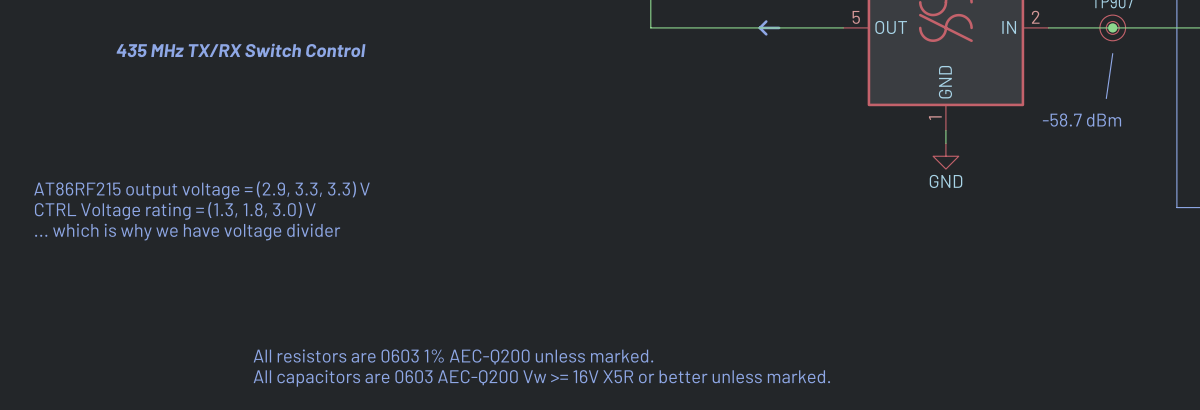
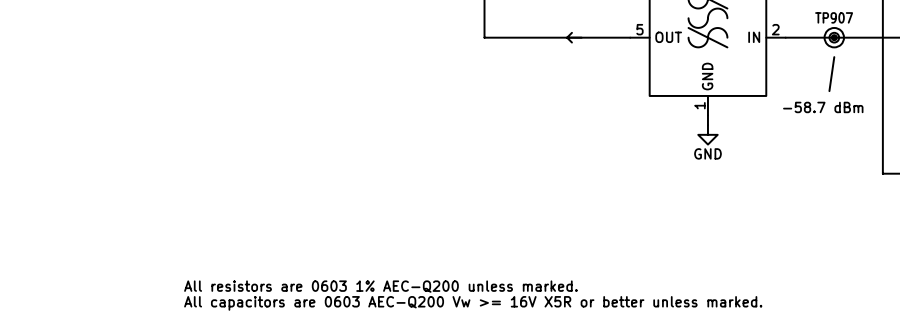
text: 435 MHz TX/RX Switch Control (241, 50) -> none
text: AT86RF215 output voltage = (2.9, 3.3, 3.3) V (201, 190) -> none
text: CTRL Voltage rating = (1.3, 1.8, 3.0) V (175, 210) -> none
text: ... which is why we have voltage divider (187, 232) -> none

